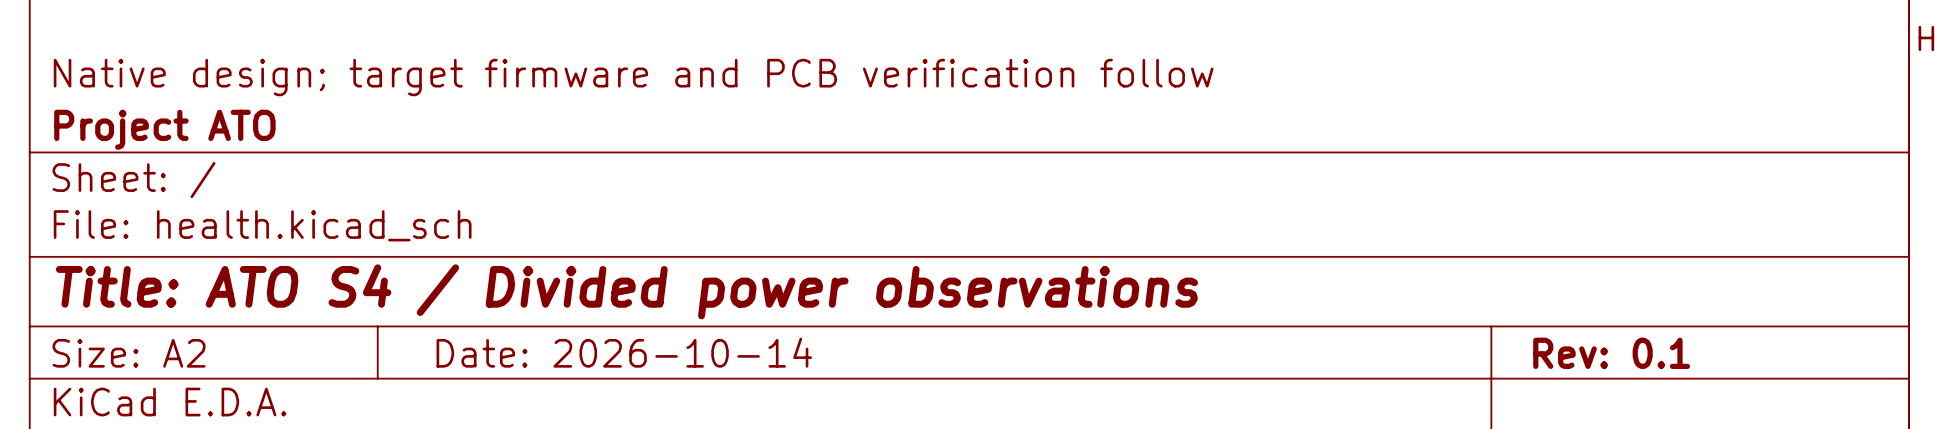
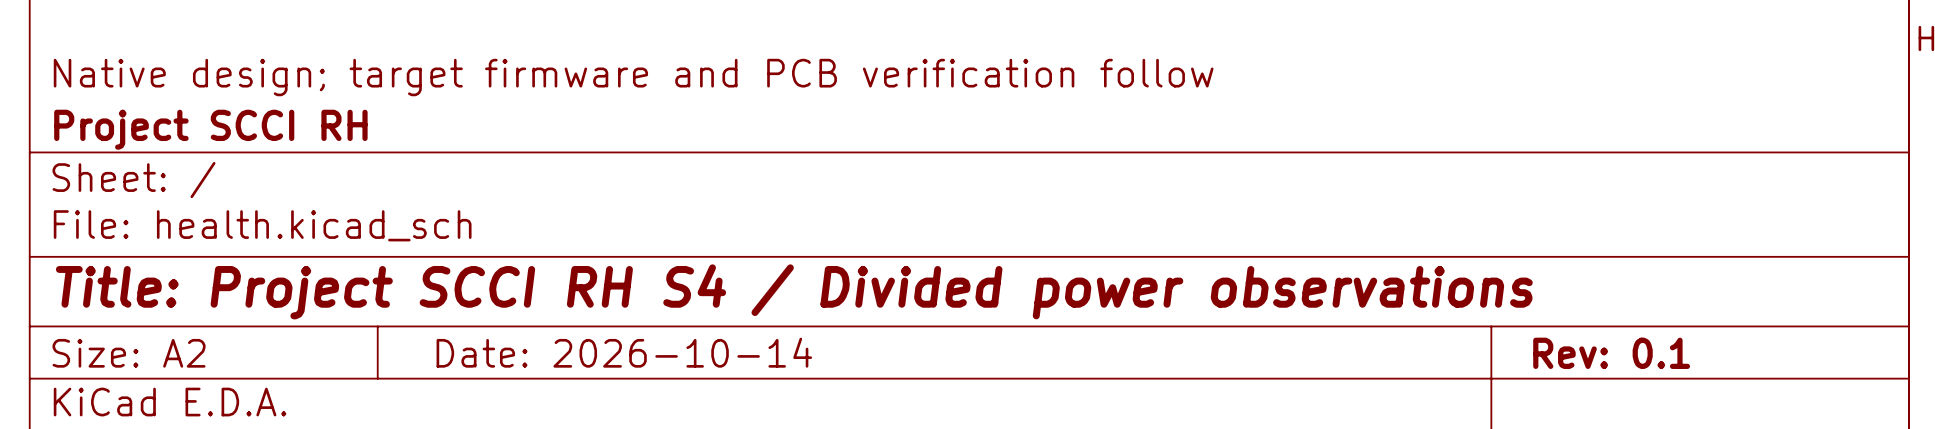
title block: Project ATO (164, 129) -> Project SCCI RH (210, 129)
title block: Title: ATO S4 / Divided power observations (626, 291) -> Title: Project SCCI RH S4 / Divided power observations (794, 291)

